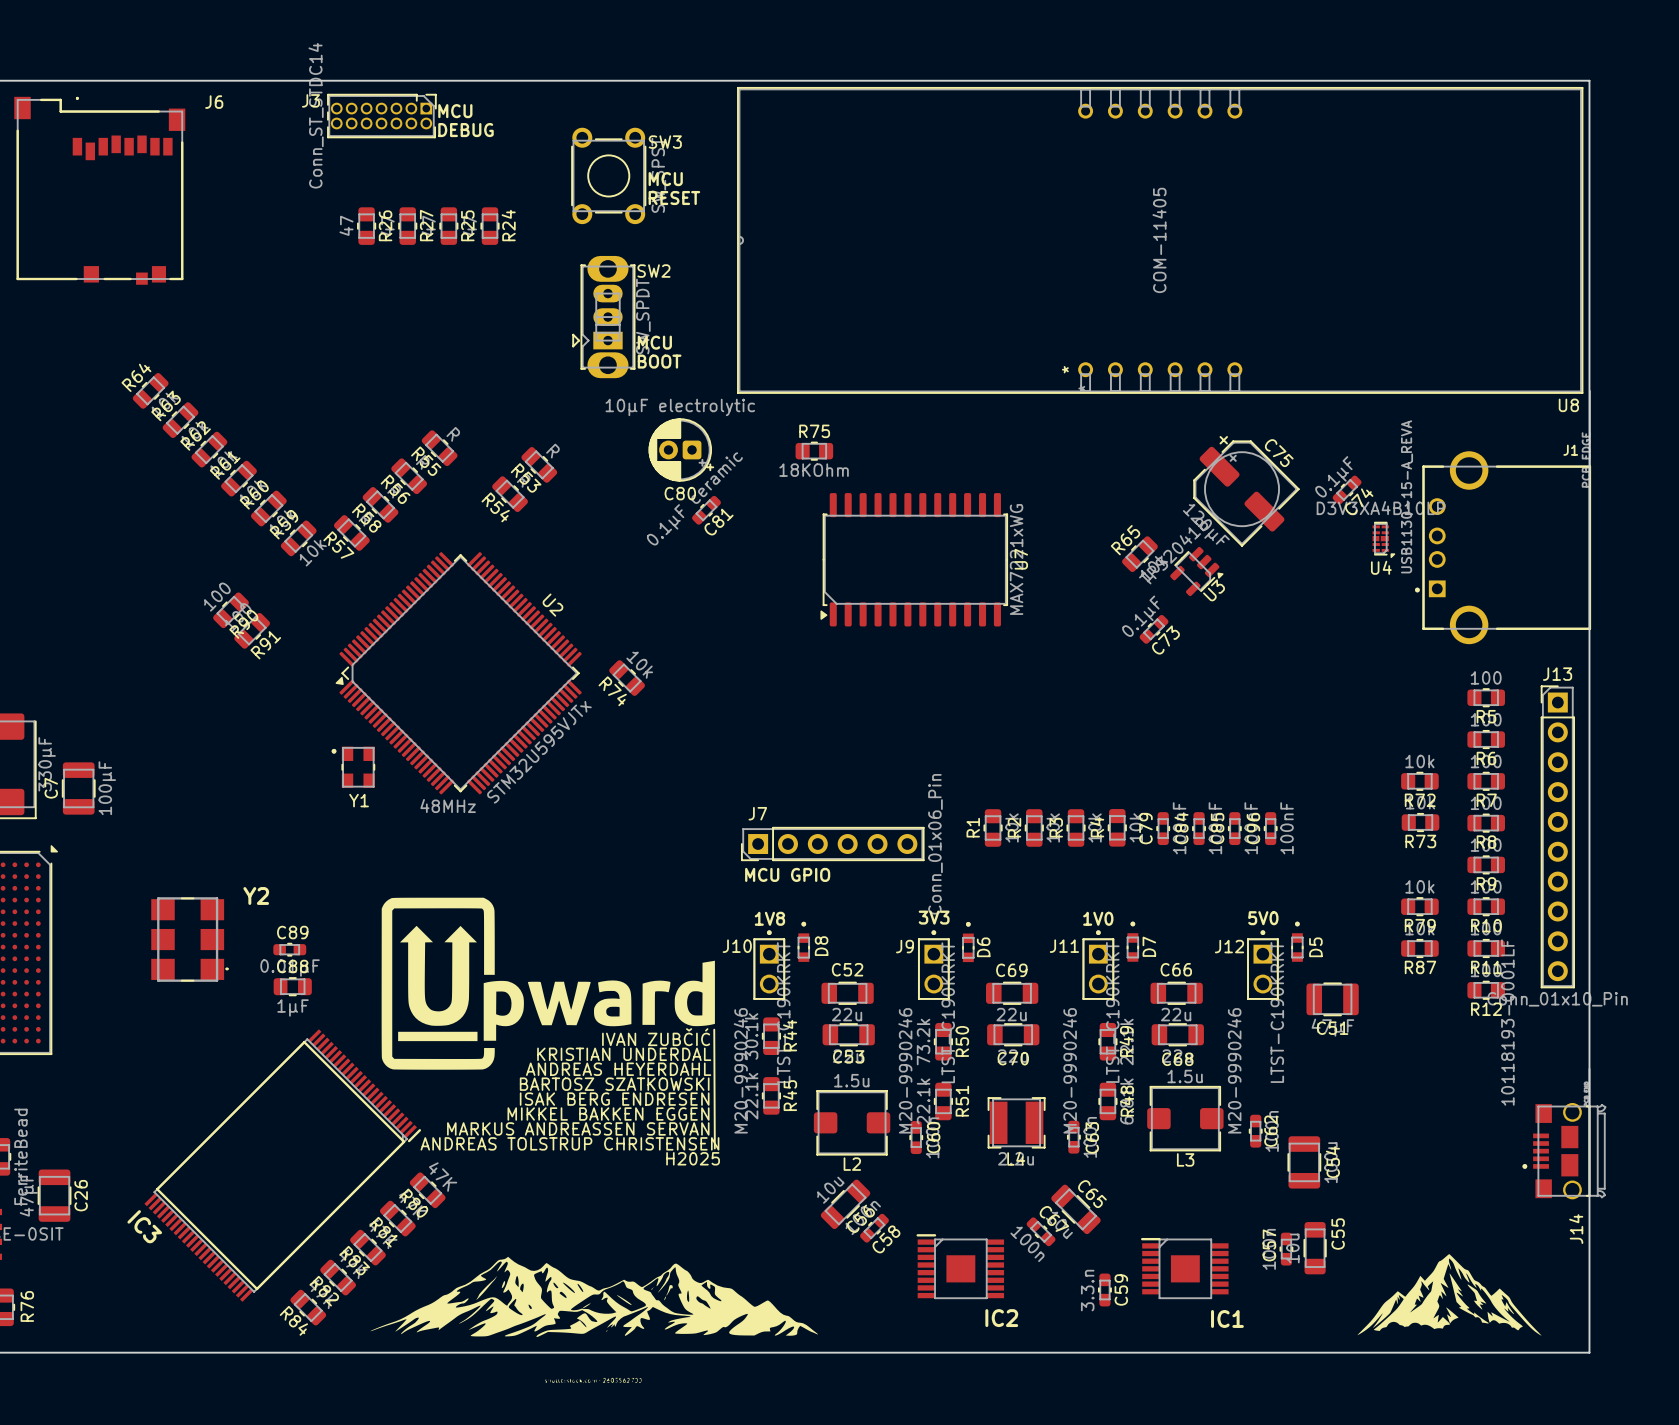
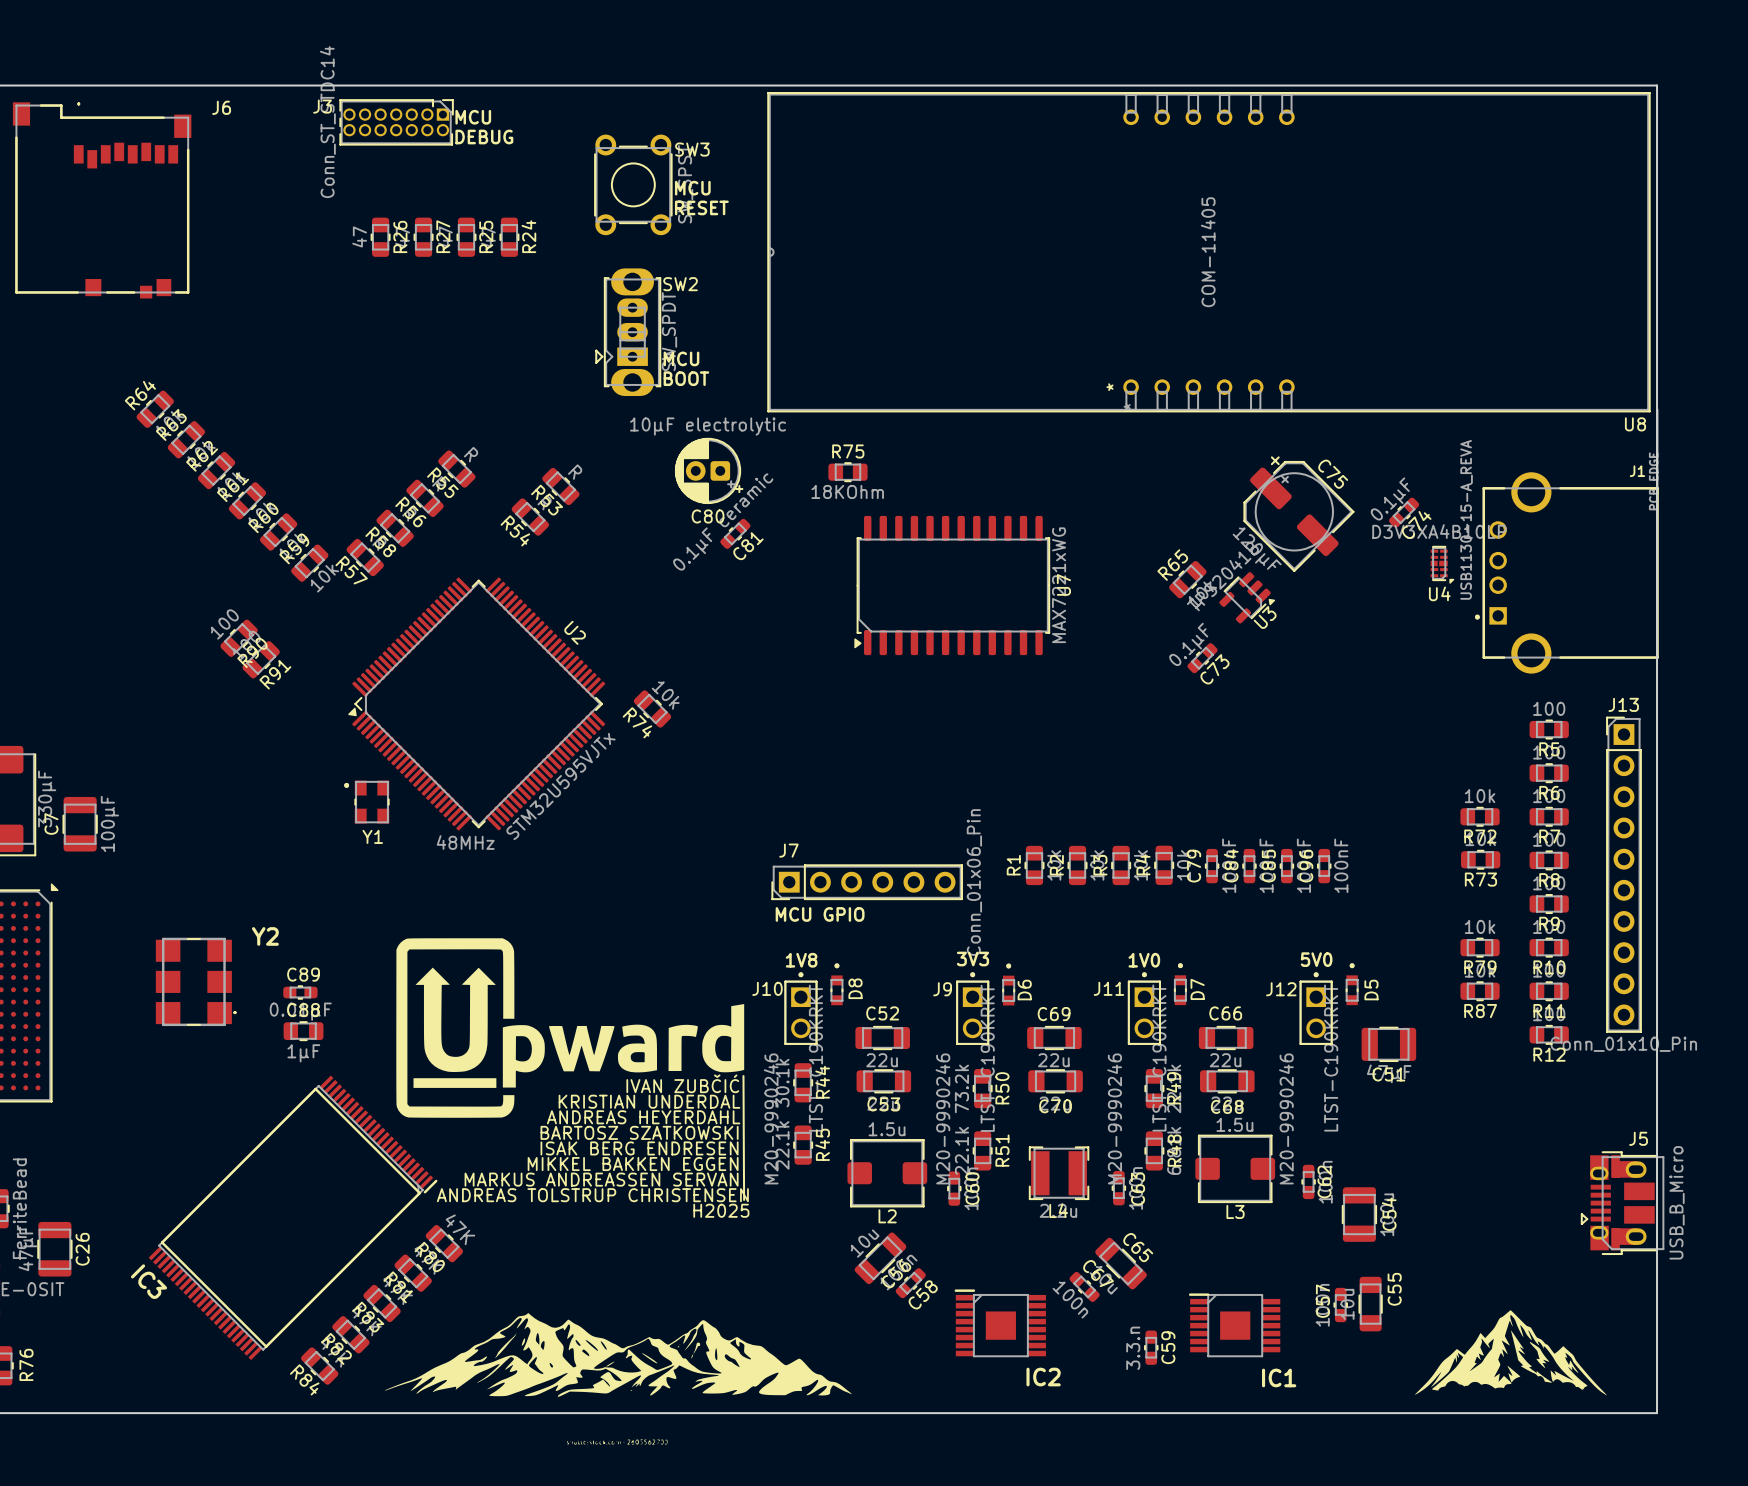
J14: 10118193-0001LF (1564, 1133) -> none
J5: none -> USB_B_Micro (1622, 1203)

